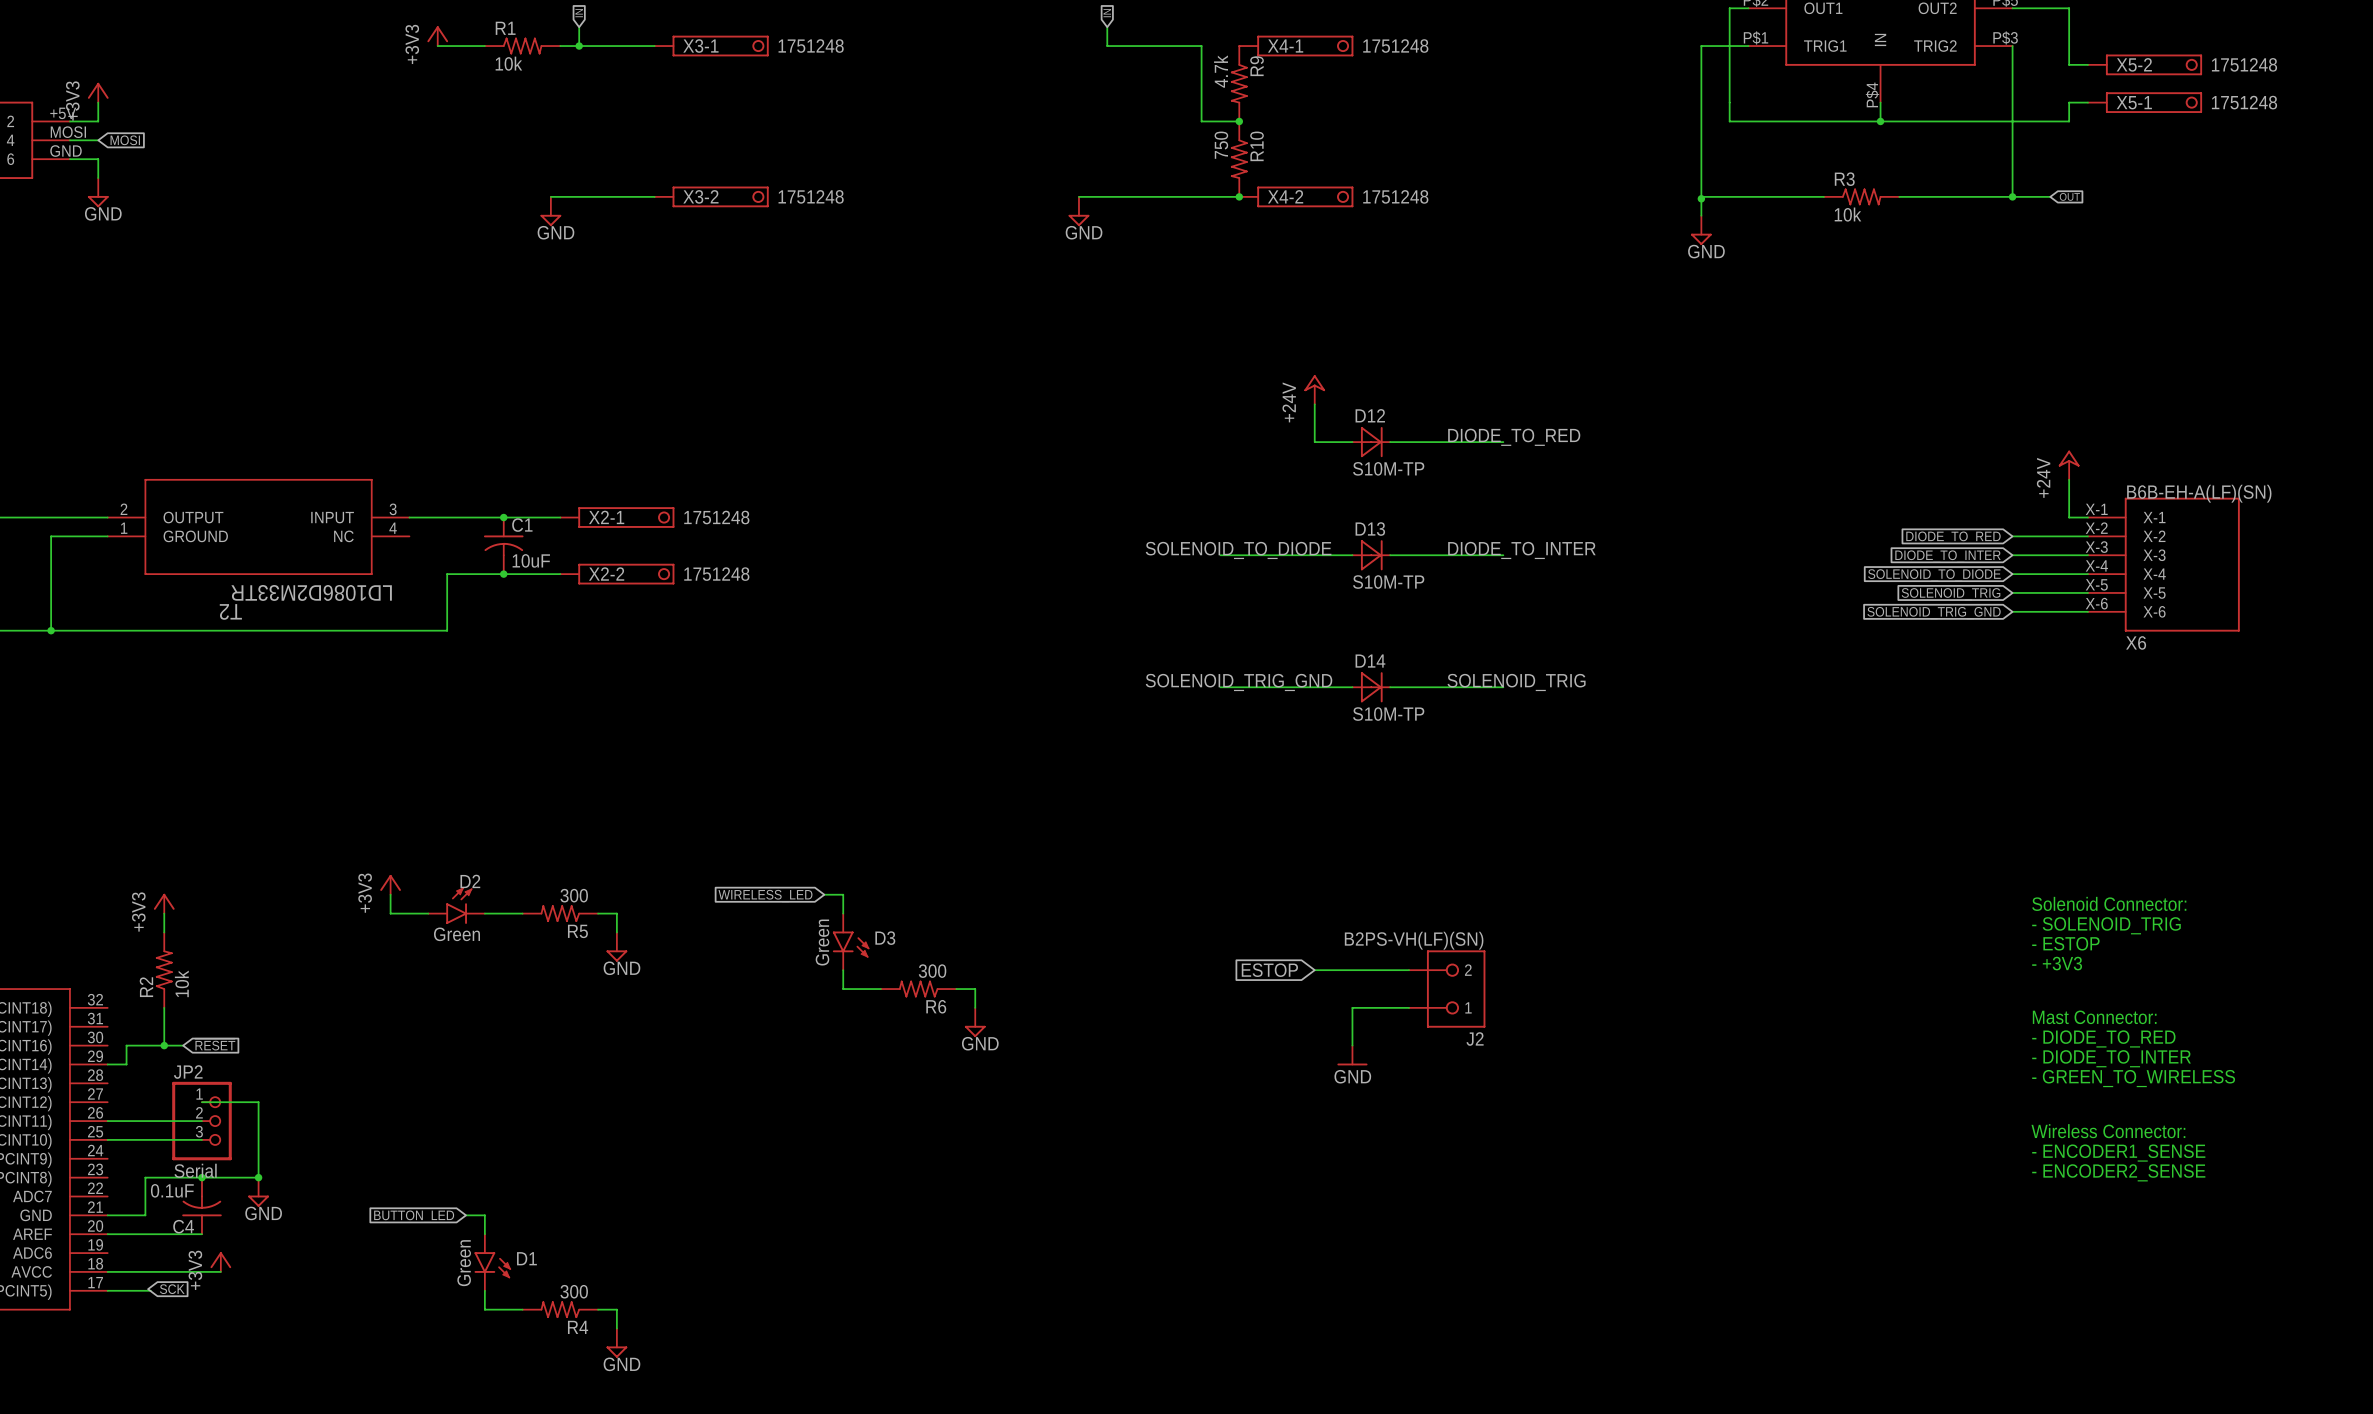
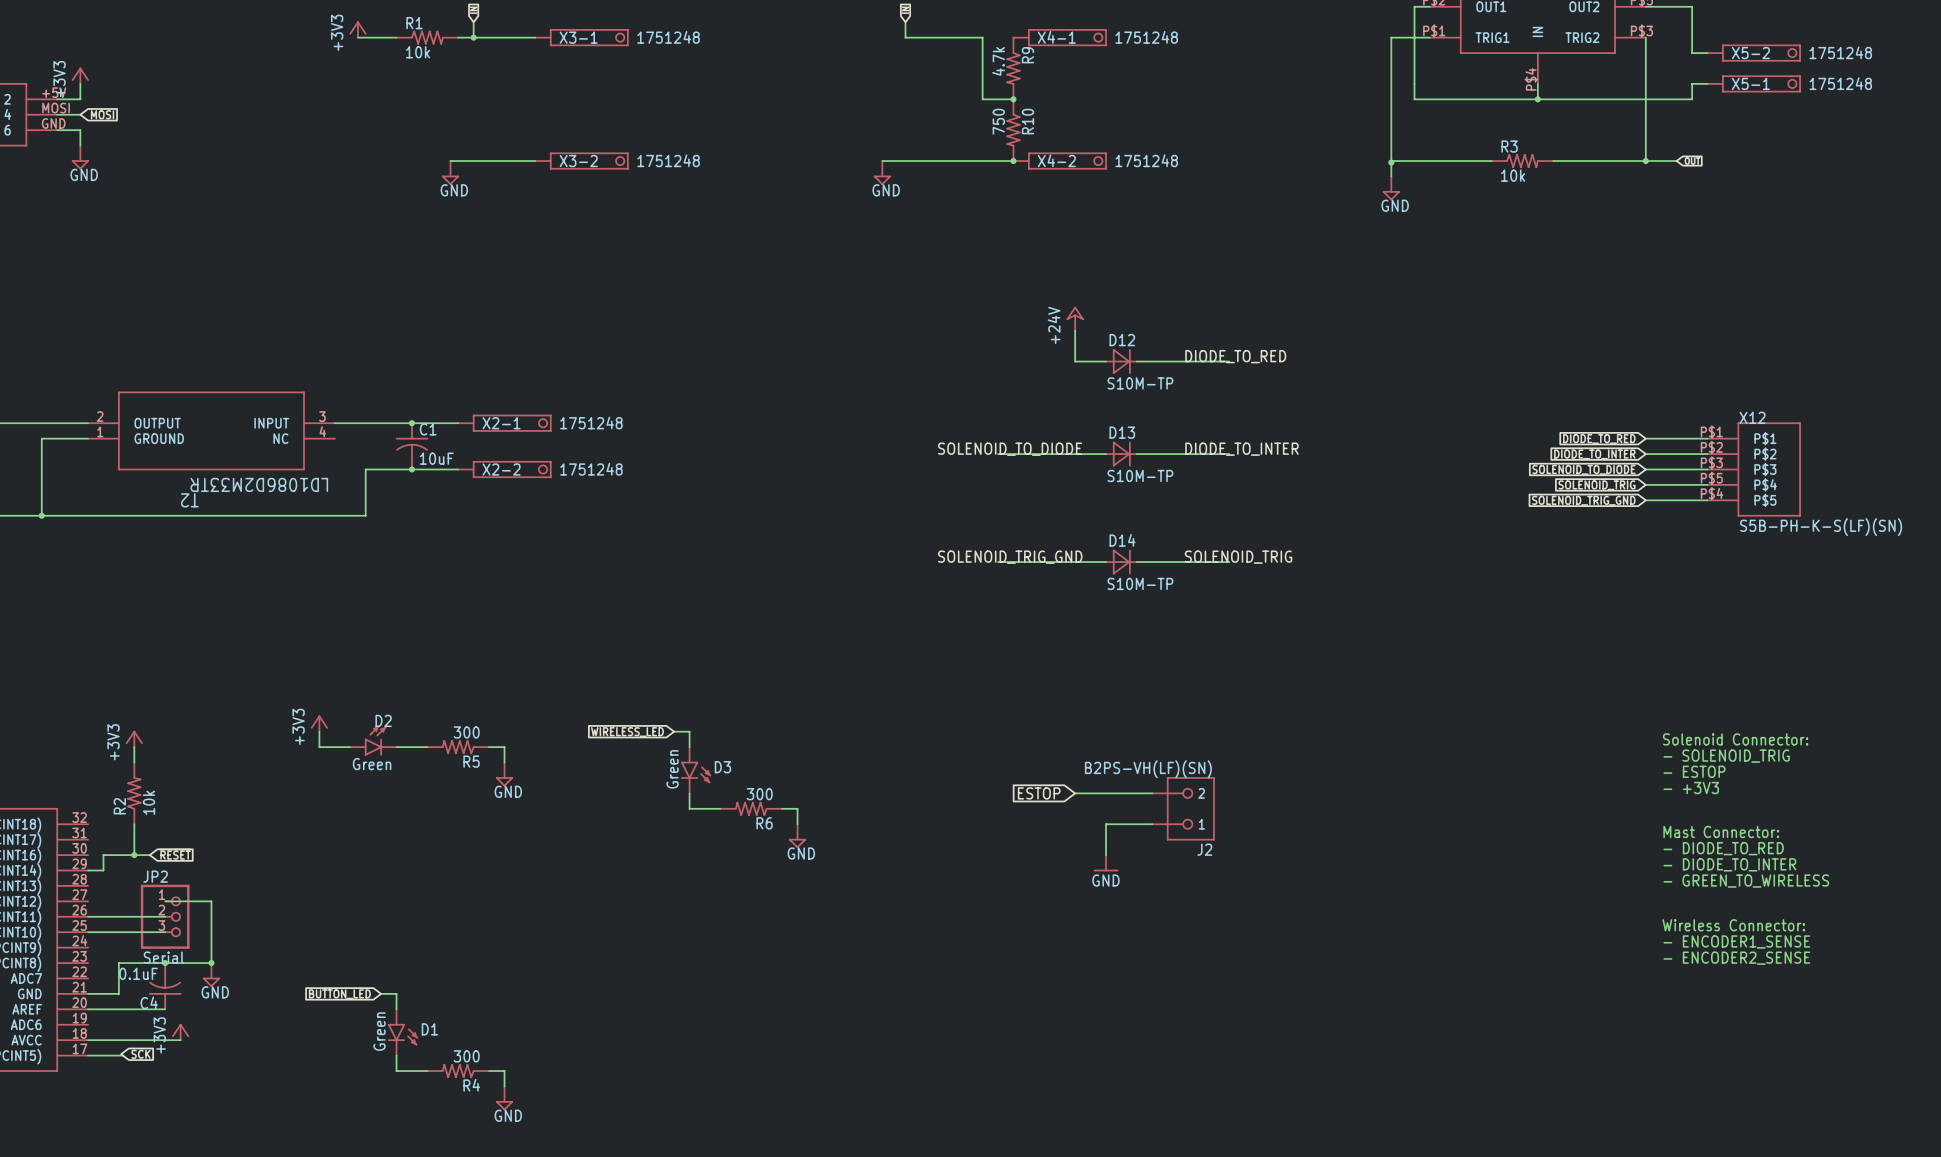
power symbol: +24V (2069, 465) -> none
wire: (2069, 479) (2069, 517) (2088, 517) -> none
X6: B6B-EH-A(LF)(SN) (2163, 564) -> none
X12: none -> S5B-PH-K-S(LF)(SN) (1754, 469)

